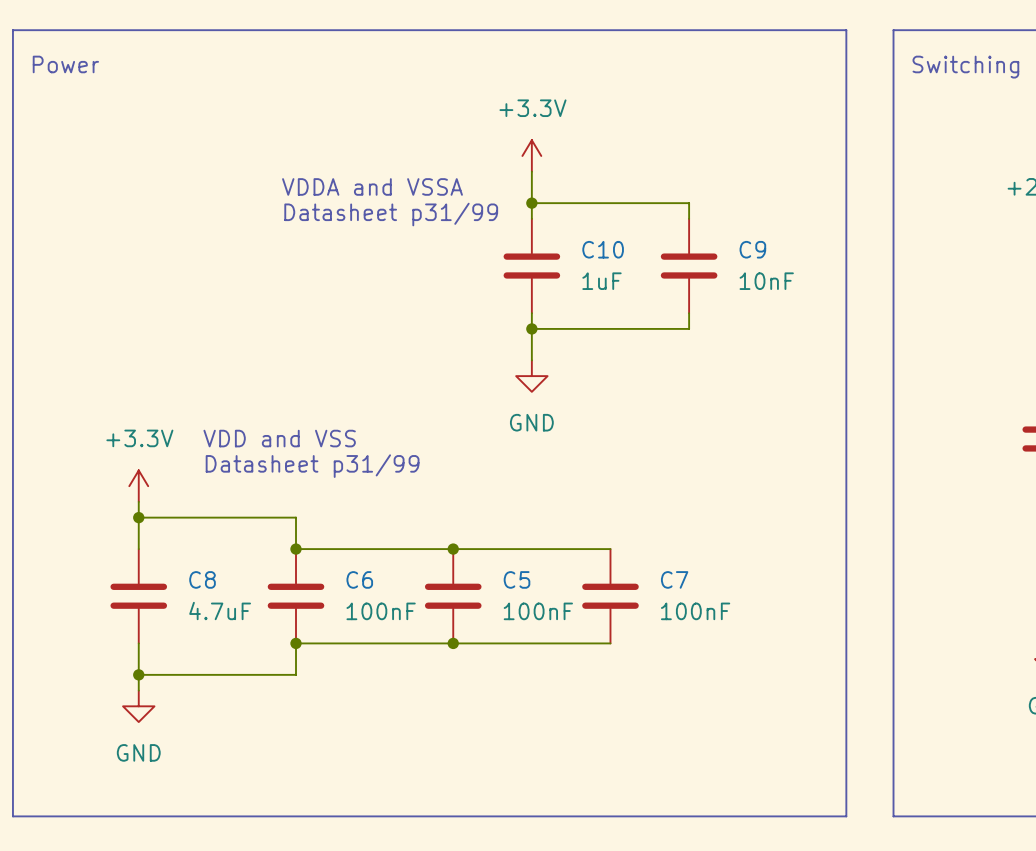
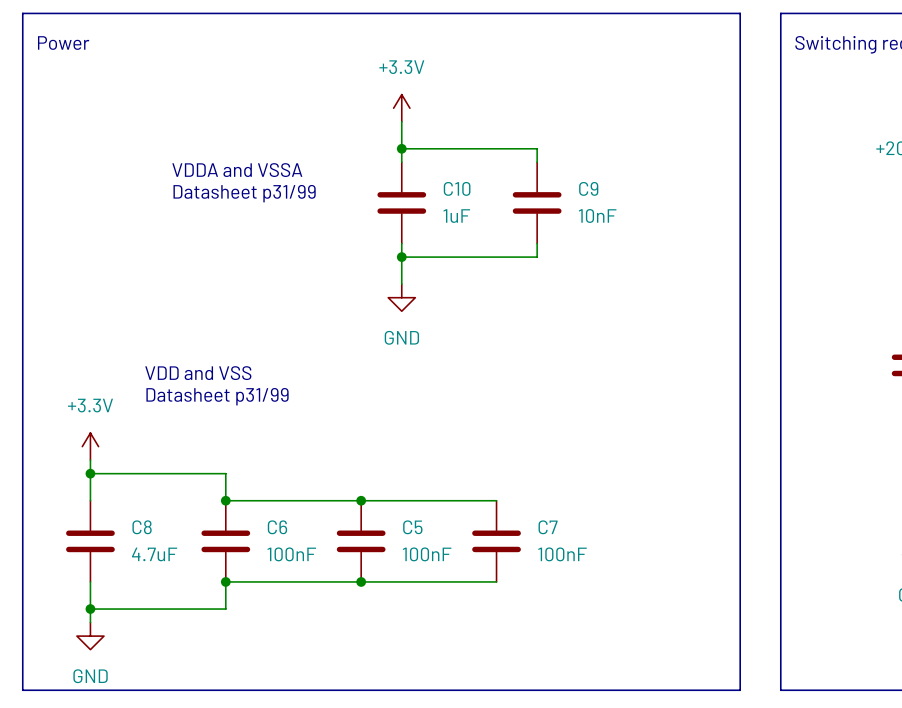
power symbol position: +3.3V (531, 155) -> +3.3V (401, 108)
wire: (531, 171) (531, 218) -> (401, 121) (401, 162)
text position: VDDA and VSSA (372, 186) -> VDDA and VSSA (237, 170)
junction: none -> (401, 148)
wire: (531, 203) (689, 203) (689, 218) -> (401, 148) (537, 148) (537, 162)
junction: (531, 203) -> none
text position: Datasheet p31/99 (391, 214) -> Datasheet p31/99 (244, 193)
C10 position: (531, 266) -> (401, 202)
C9 position: (689, 266) -> (537, 202)
junction: none -> (401, 257)
wire: (531, 313) (531, 360) -> (401, 243) (401, 284)
wire: (689, 313) (689, 328) (531, 328) -> (537, 243) (537, 257) (401, 257)
junction: (531, 328) -> none
power symbol position: GND (531, 376) -> GND (401, 297)
text position: VDD and VSS (279, 438) -> VDD and VSS (198, 373)
text position: Datasheet p31/99 (312, 466) -> Datasheet p31/99 (217, 396)
power symbol position: +3.3V (138, 486) -> +3.3V (90, 446)
wire: (138, 501) (138, 549) -> (90, 460) (90, 500)
wire: (138, 517) (296, 517) (296, 549) (610, 549) -> (90, 473) (225, 473) (225, 500) (496, 500)
junction: (138, 517) -> none
junction: (296, 549) -> none
junction: (453, 549) -> none
junction: none -> (90, 473)
C8 position: (138, 596) -> (90, 541)
junction: none -> (225, 500)
C6 position: (296, 596) -> (225, 541)
junction: none -> (361, 500)
C5 position: (453, 596) -> (361, 541)
C7 position: (610, 596) -> (496, 541)
wire: (138, 643) (138, 690) -> (90, 581) (90, 622)
junction: (296, 643) -> none
junction: (453, 643) -> none
wire: (610, 643) (296, 643) (296, 674) (138, 674) -> (496, 581) (225, 581) (225, 609) (90, 609)
junction: (138, 674) -> none
junction: none -> (225, 581)
junction: none -> (361, 581)
power symbol position: GND (138, 706) -> GND (90, 636)
junction: none -> (90, 609)

